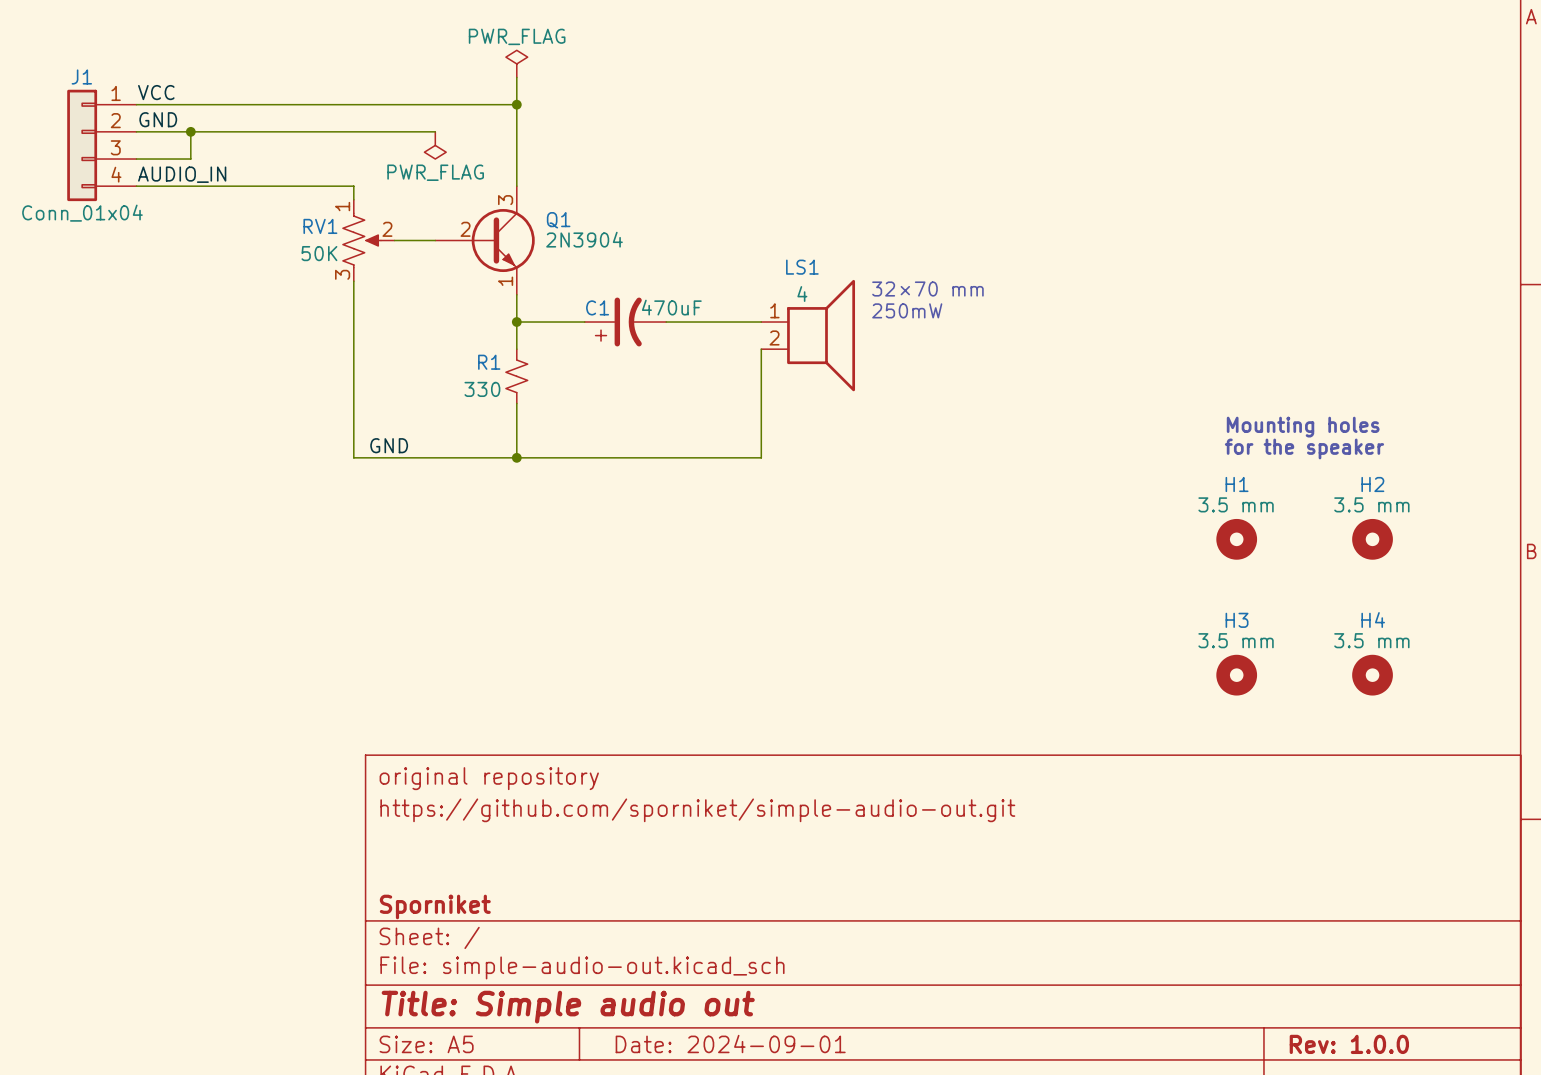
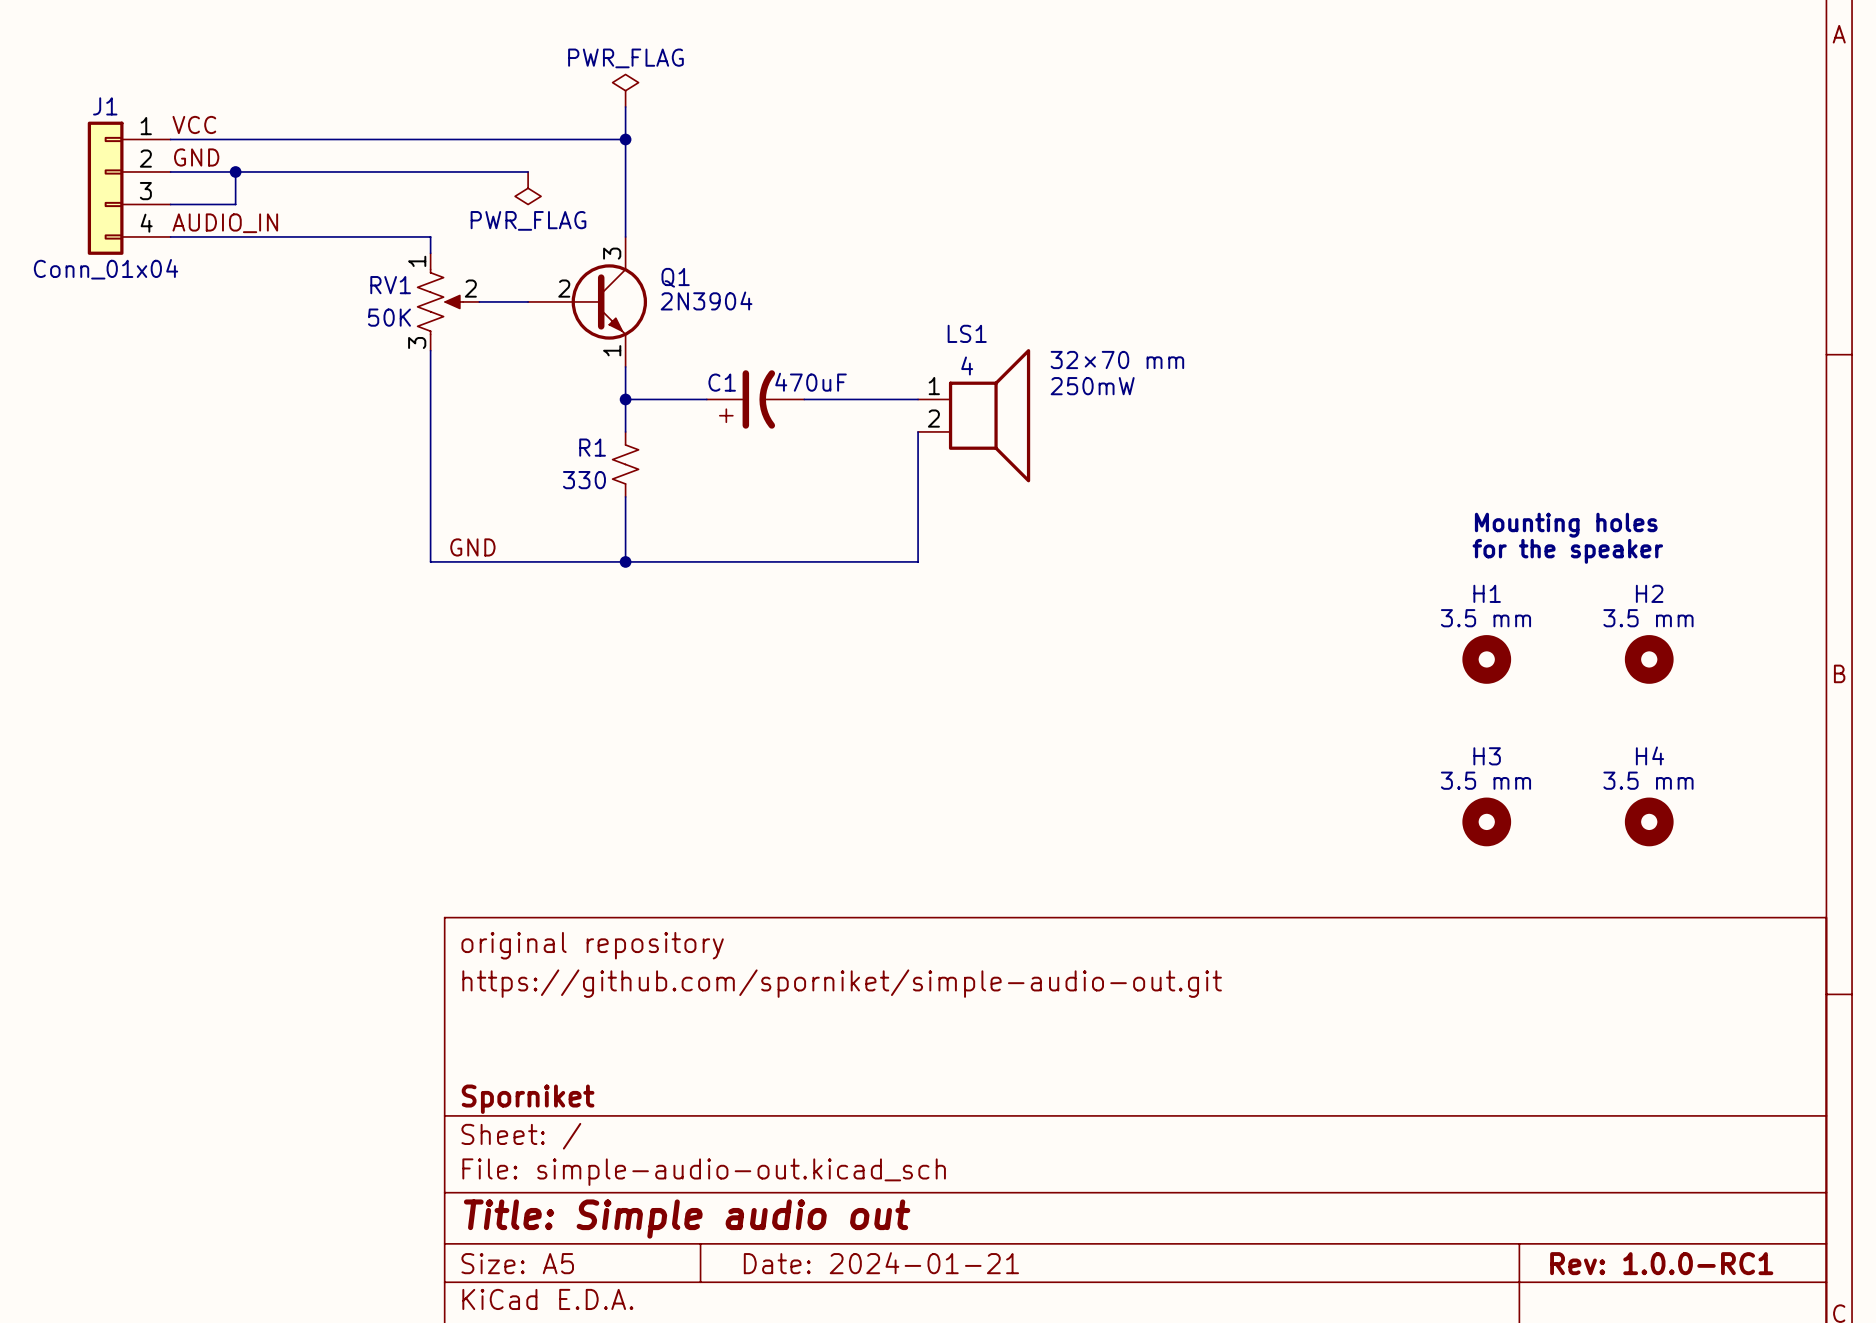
title block: Date: 2024-09-01 (730, 1044) -> Date: 2024-01-21 (881, 1263)
title block: Rev: 1.0.0 (1349, 1044) -> Rev: 1.0.0-RC1 (1661, 1263)

